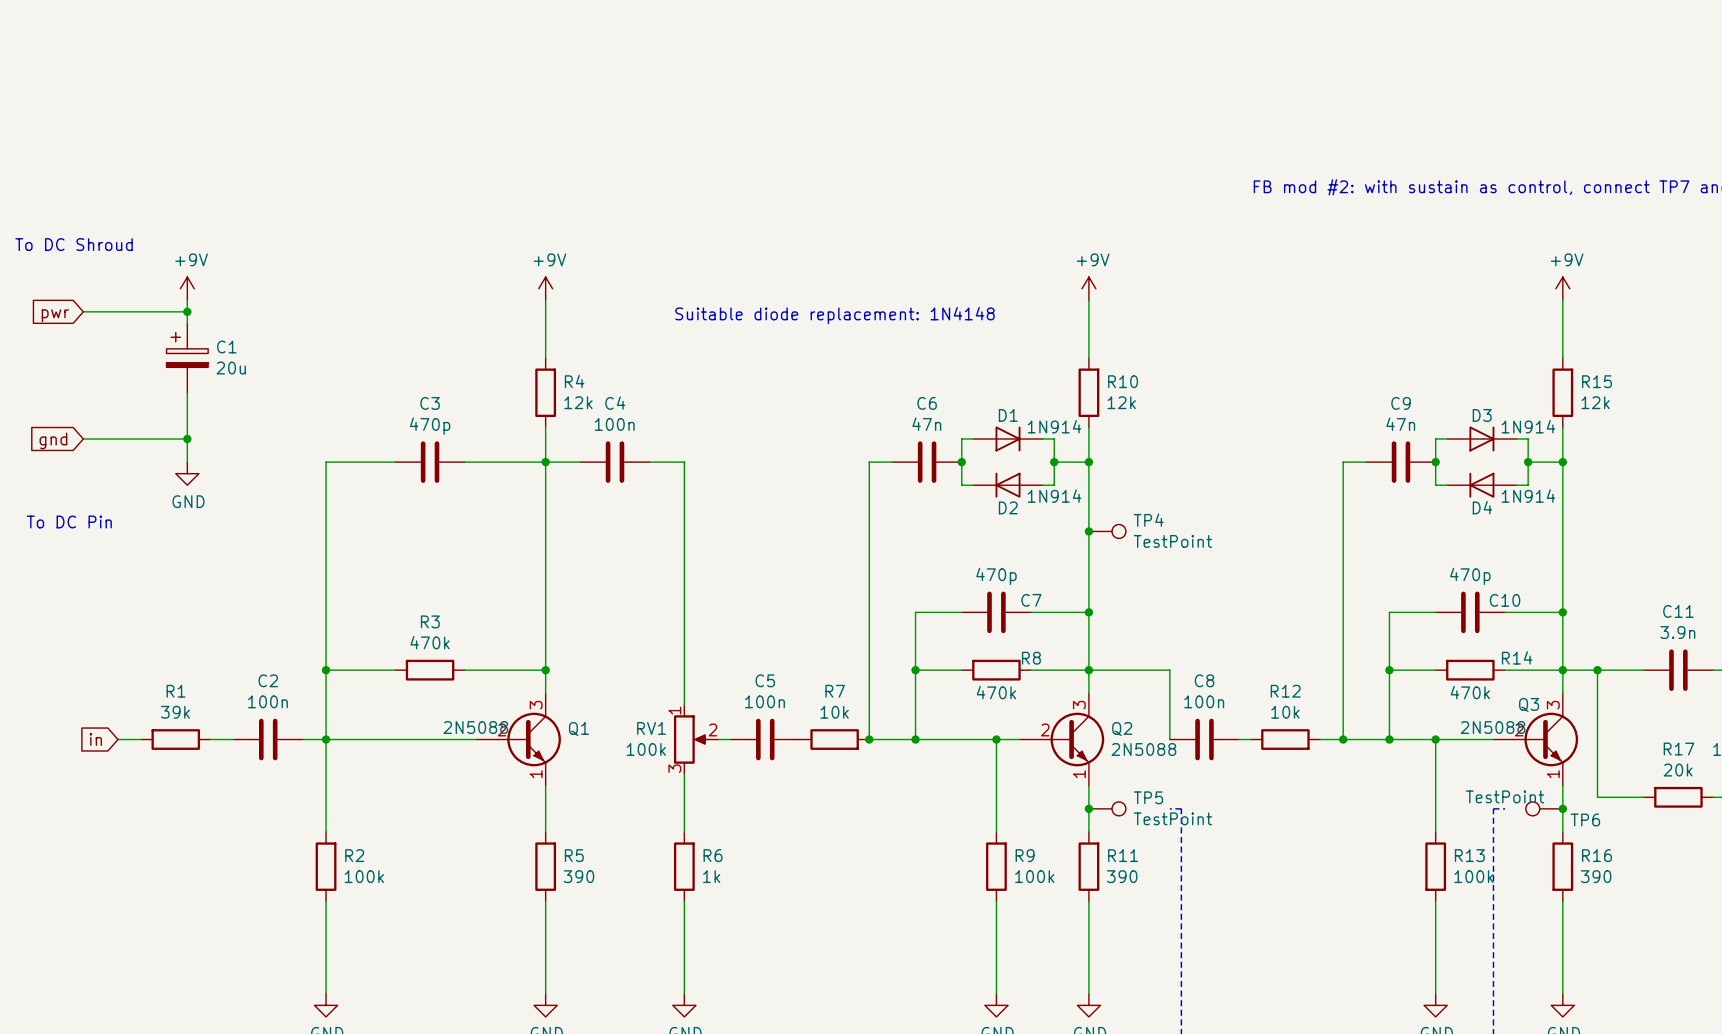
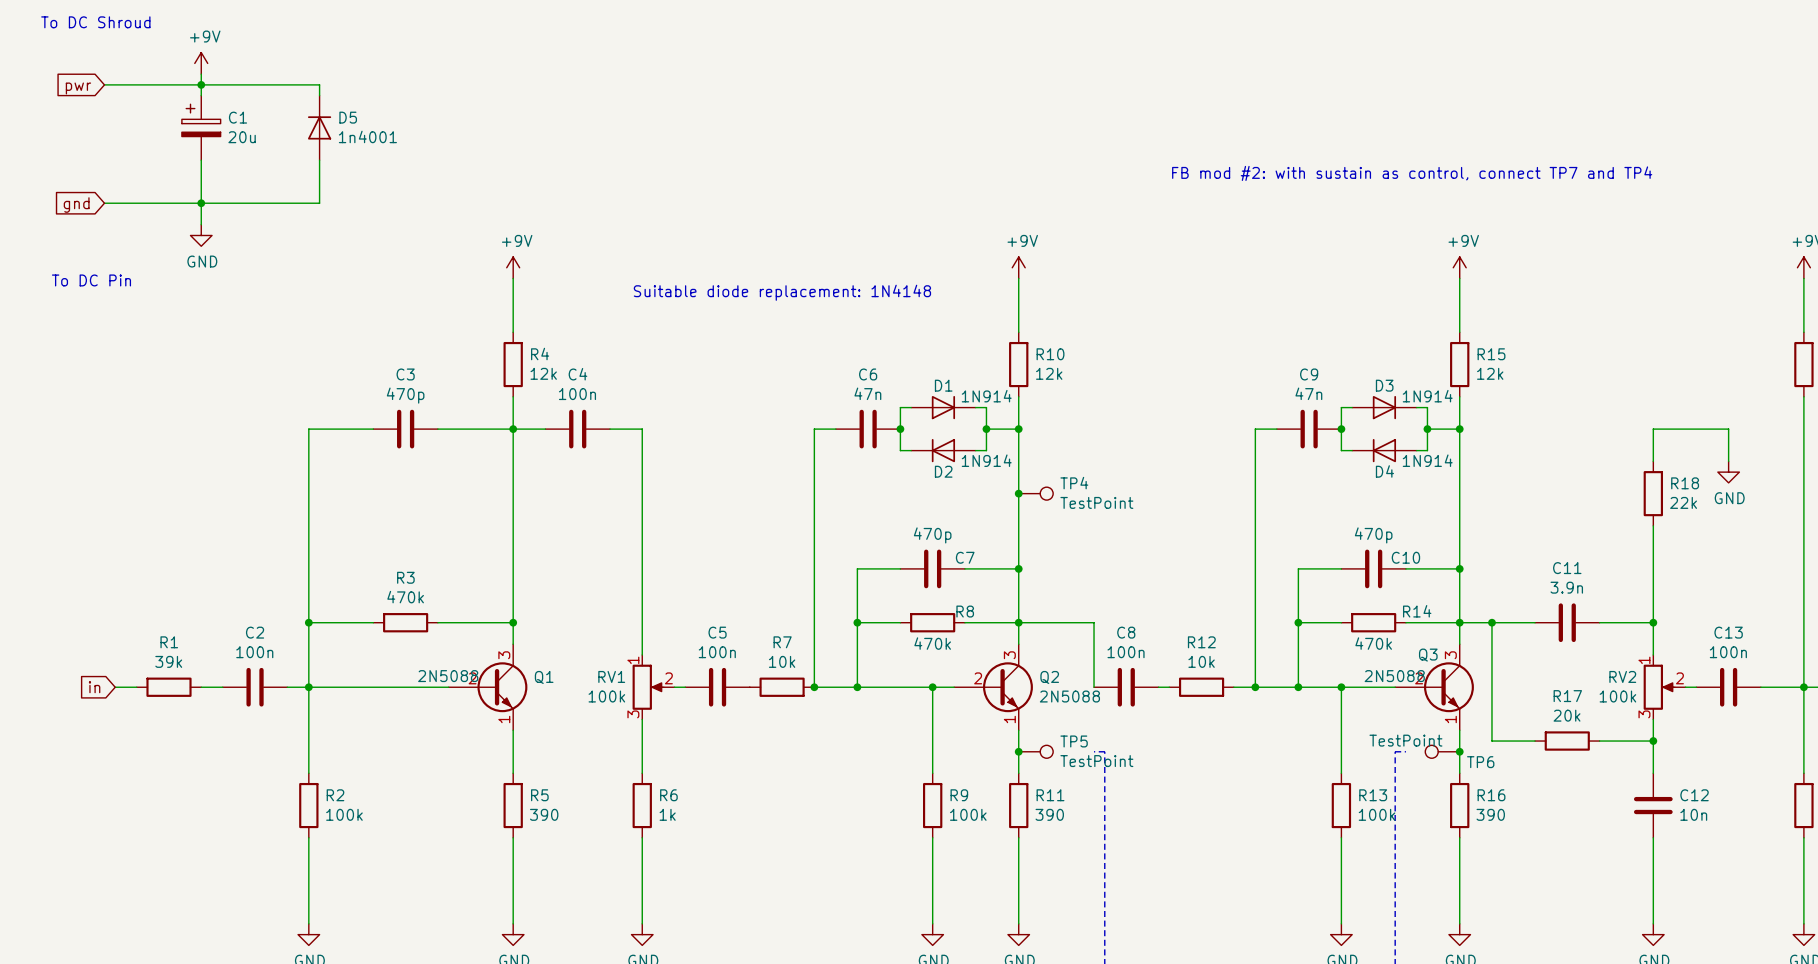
wire: none -> (104, 84) (319, 84) (319, 95)
junction: none -> (201, 84)
D5: none -> 1n4001 (319, 127)
wire: none -> (319, 160) (319, 203) (104, 203)
junction: none -> (201, 203)
text position: To DC Shroud (74, 244) -> To DC Shroud (95, 22)
power symbol position: +9V (187, 288) -> +9V (201, 63)
wire: (187, 300) (187, 323) -> (201, 74) (201, 95)
wire: (83, 311) (187, 311) -> none
junction: (187, 311) -> none
global label position: pwr (55, 315) -> pwr (78, 88)
C1 position: (187, 358) -> (201, 127)
wire: (187, 392) (187, 462) -> (201, 160) (201, 224)
wire: (83, 438) (187, 438) -> none
junction: (187, 438) -> none
global label position: gnd (53, 440) -> gnd (76, 205)
power symbol position: GND (187, 473) -> GND (201, 235)
text position: To DC Pin (69, 521) -> To DC Pin (91, 280)

